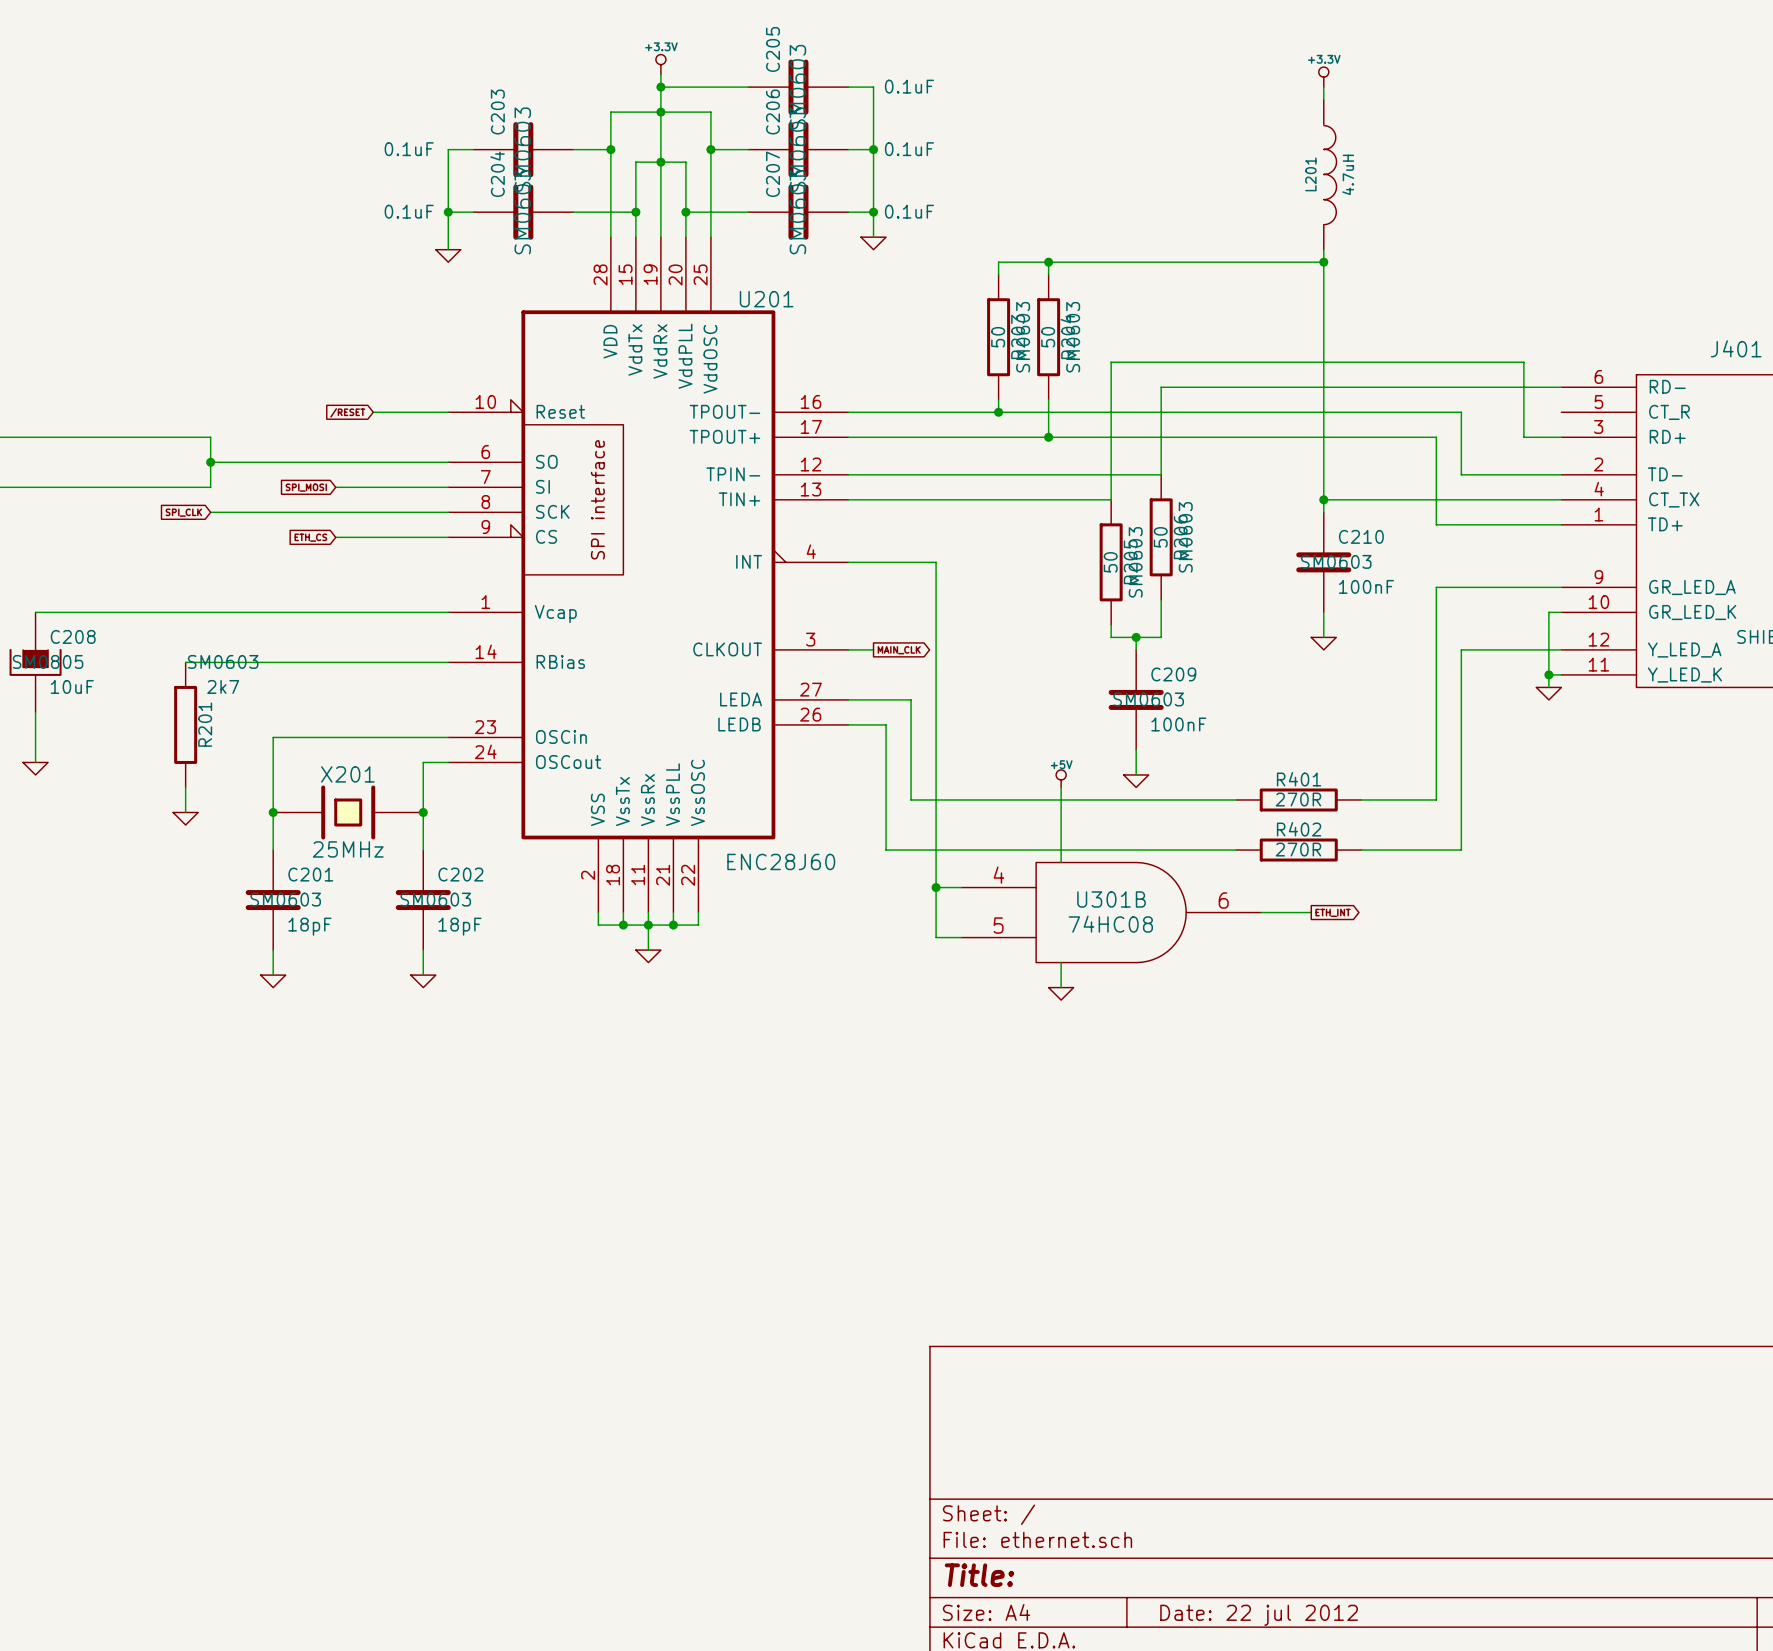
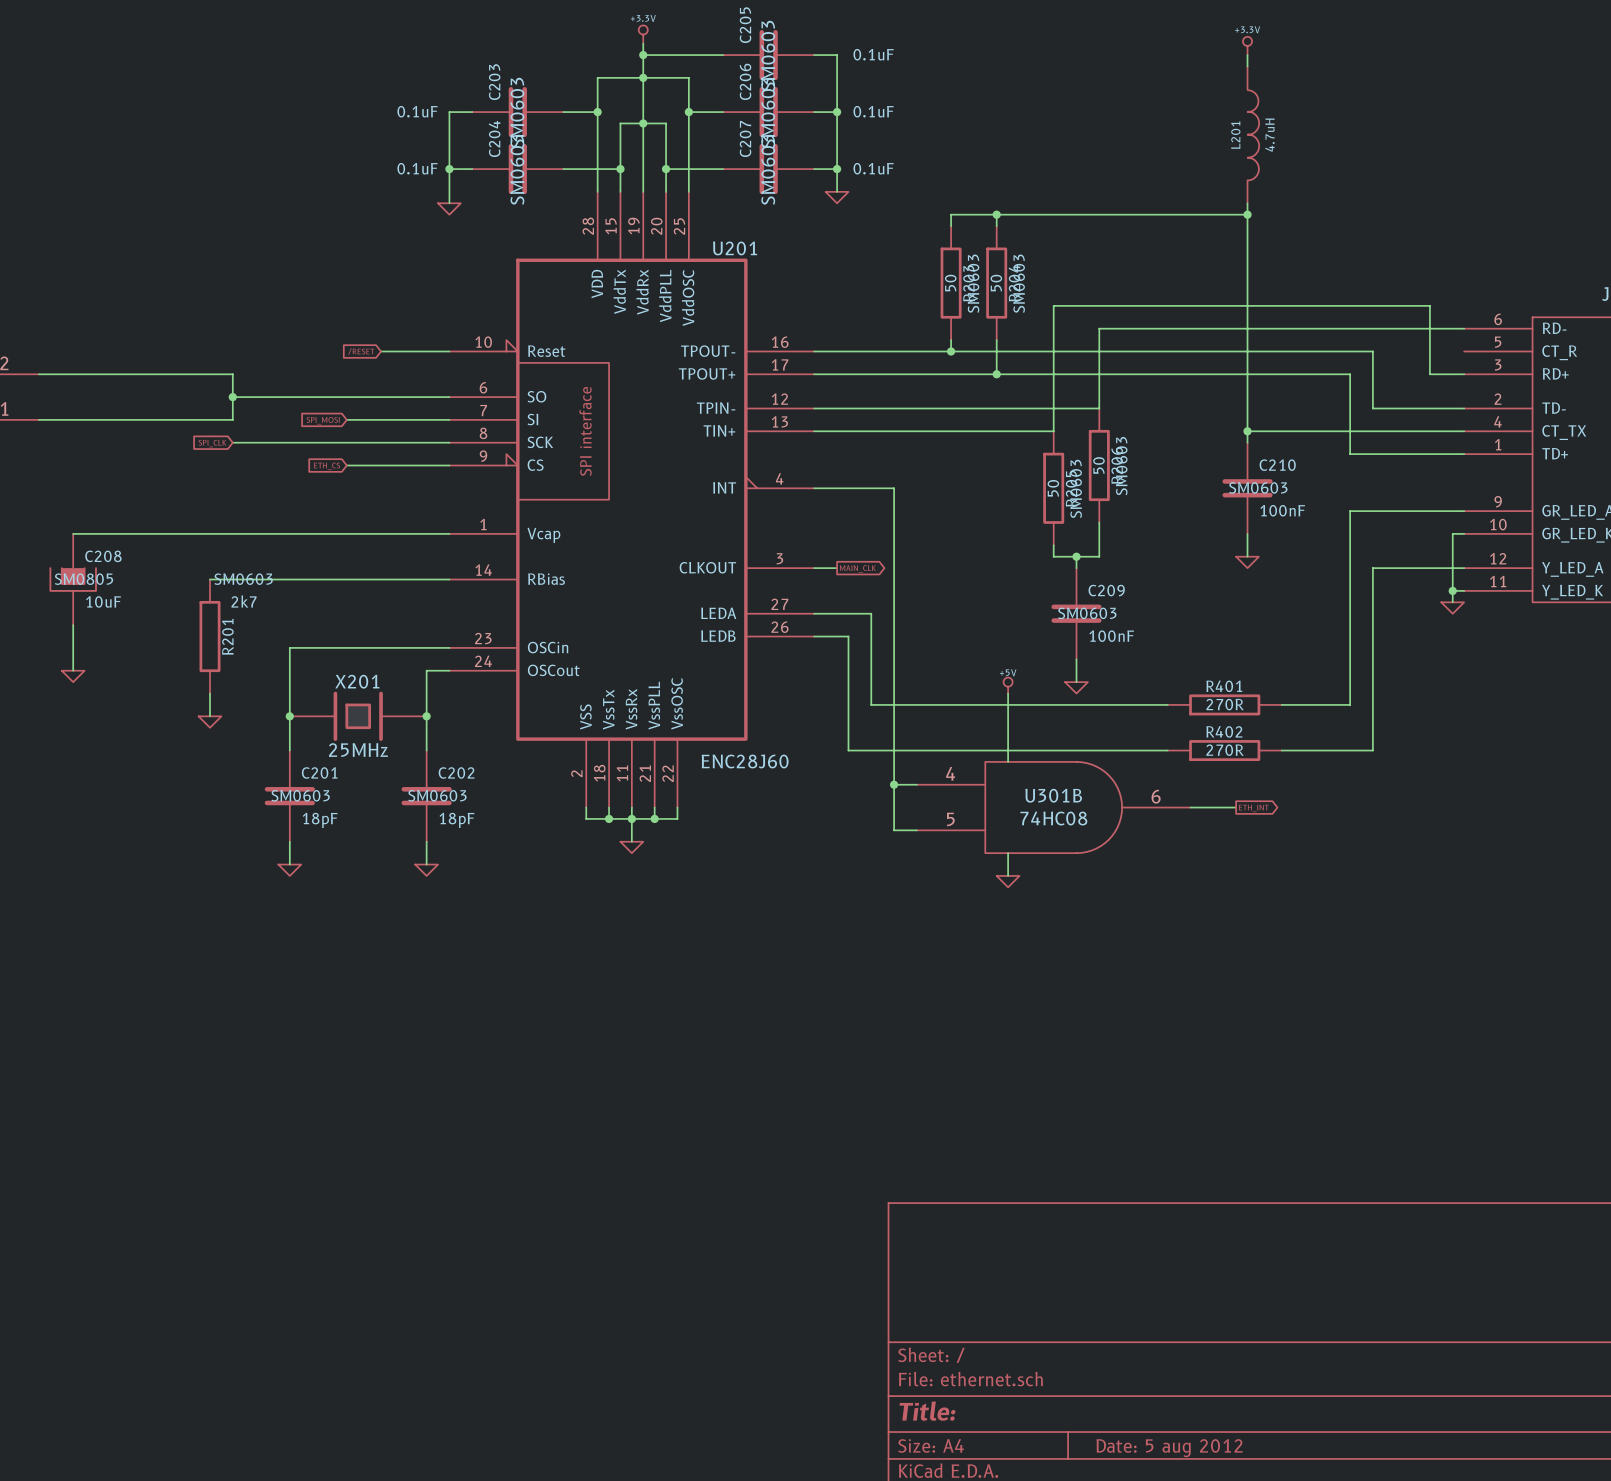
title block: Date: 22 jul 2012 (1259, 1615) -> Date: 5 aug 2012 (1169, 1448)

